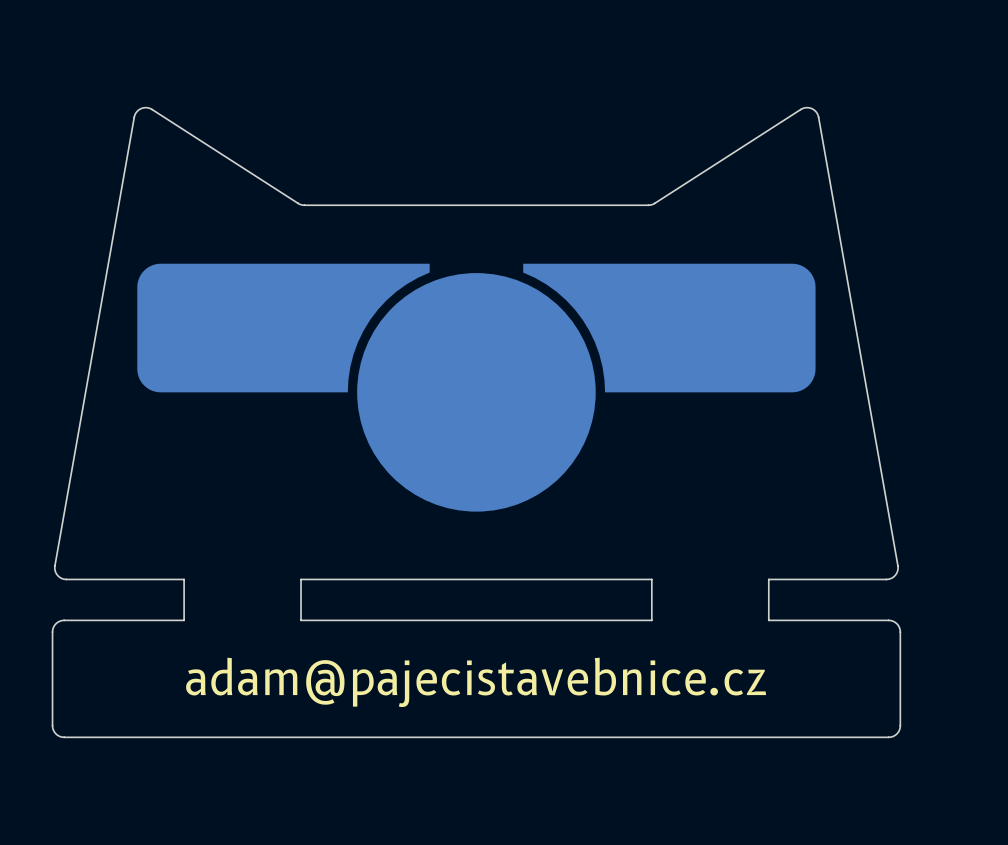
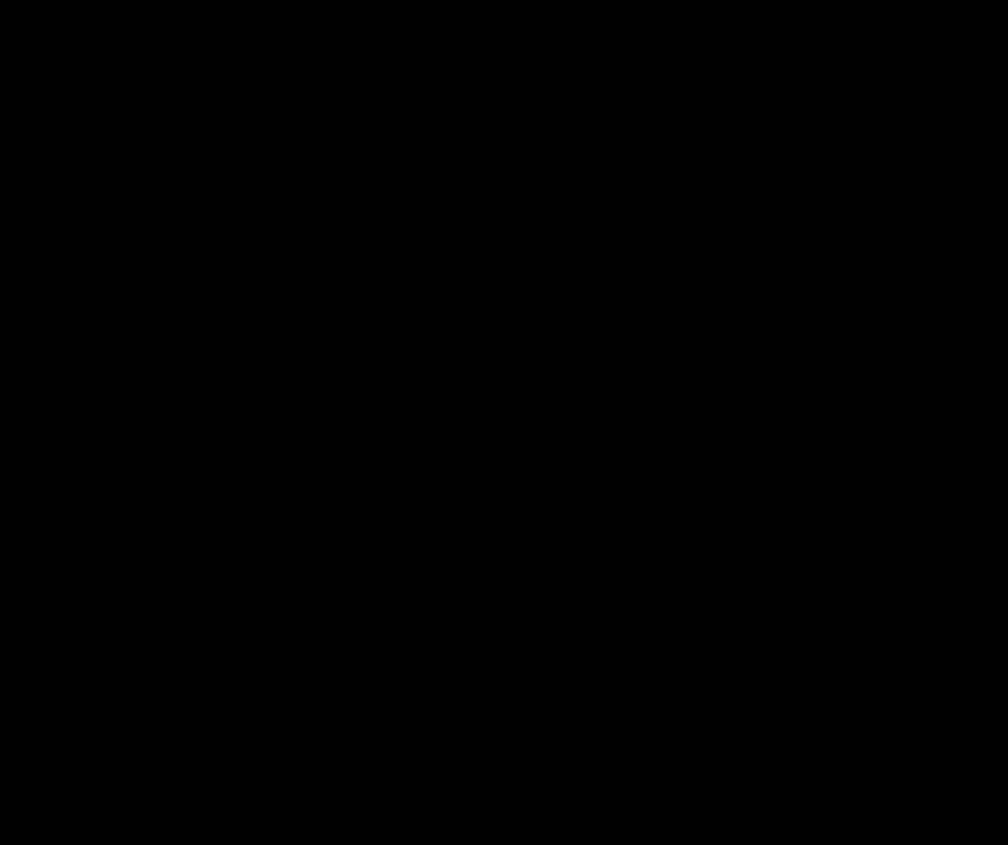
board edge: (800, 109) (654, 203) (648, 205) (302, 205) (152, 109) (145, 107) (138, 110) (134, 117) (54, 568) (57, 575) (65, 579) (184, 579) (184, 620) (64, 620) (56, 622) (52, 632) (52, 725) (54, 732) (64, 737) (888, 737) (895, 734) (900, 725) (900, 632) (896, 623) (888, 620) (768, 620) (768, 579) (887, 579) (895, 575) (898, 568) (818, 117) (811, 108) (800, 109) -> none
drawing: [137, 263, 816, 512] -> none
board edge: (651, 579) (301, 579) (301, 620) (651, 620) (651, 579) -> none
text: adam@pajecistavebnice.cz (476, 682) -> none

